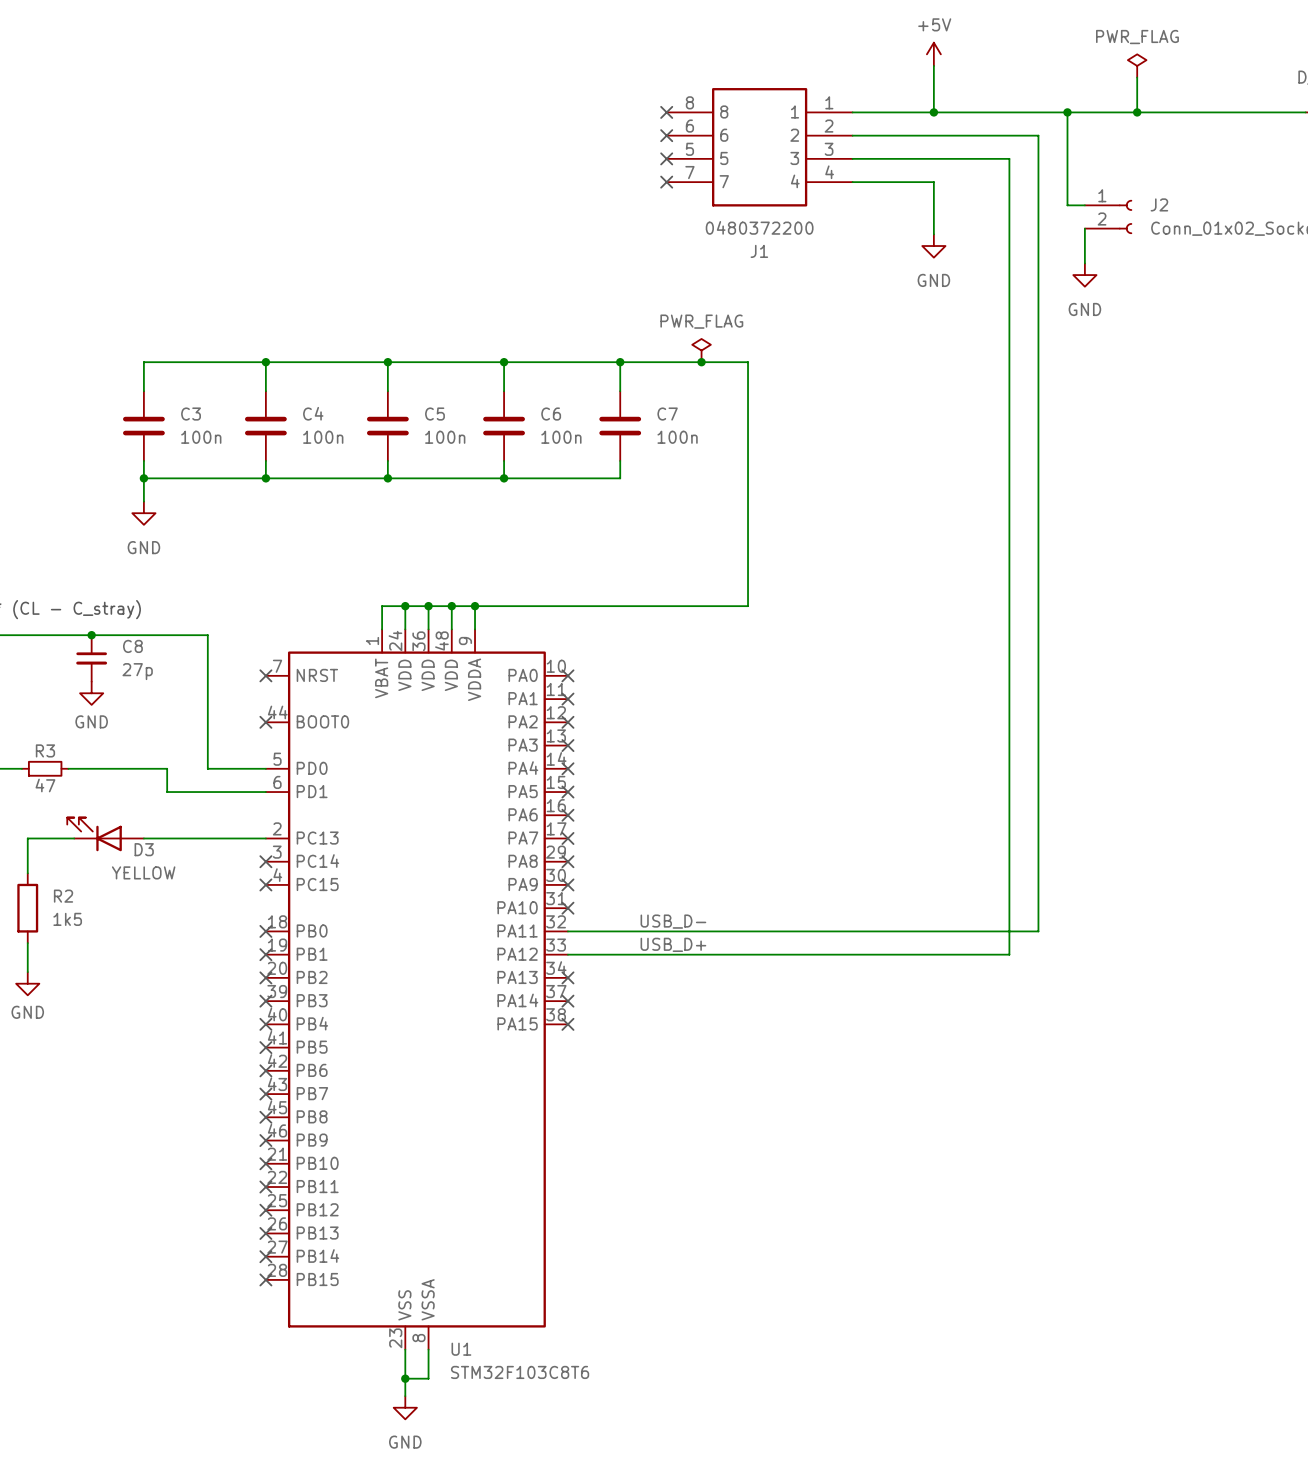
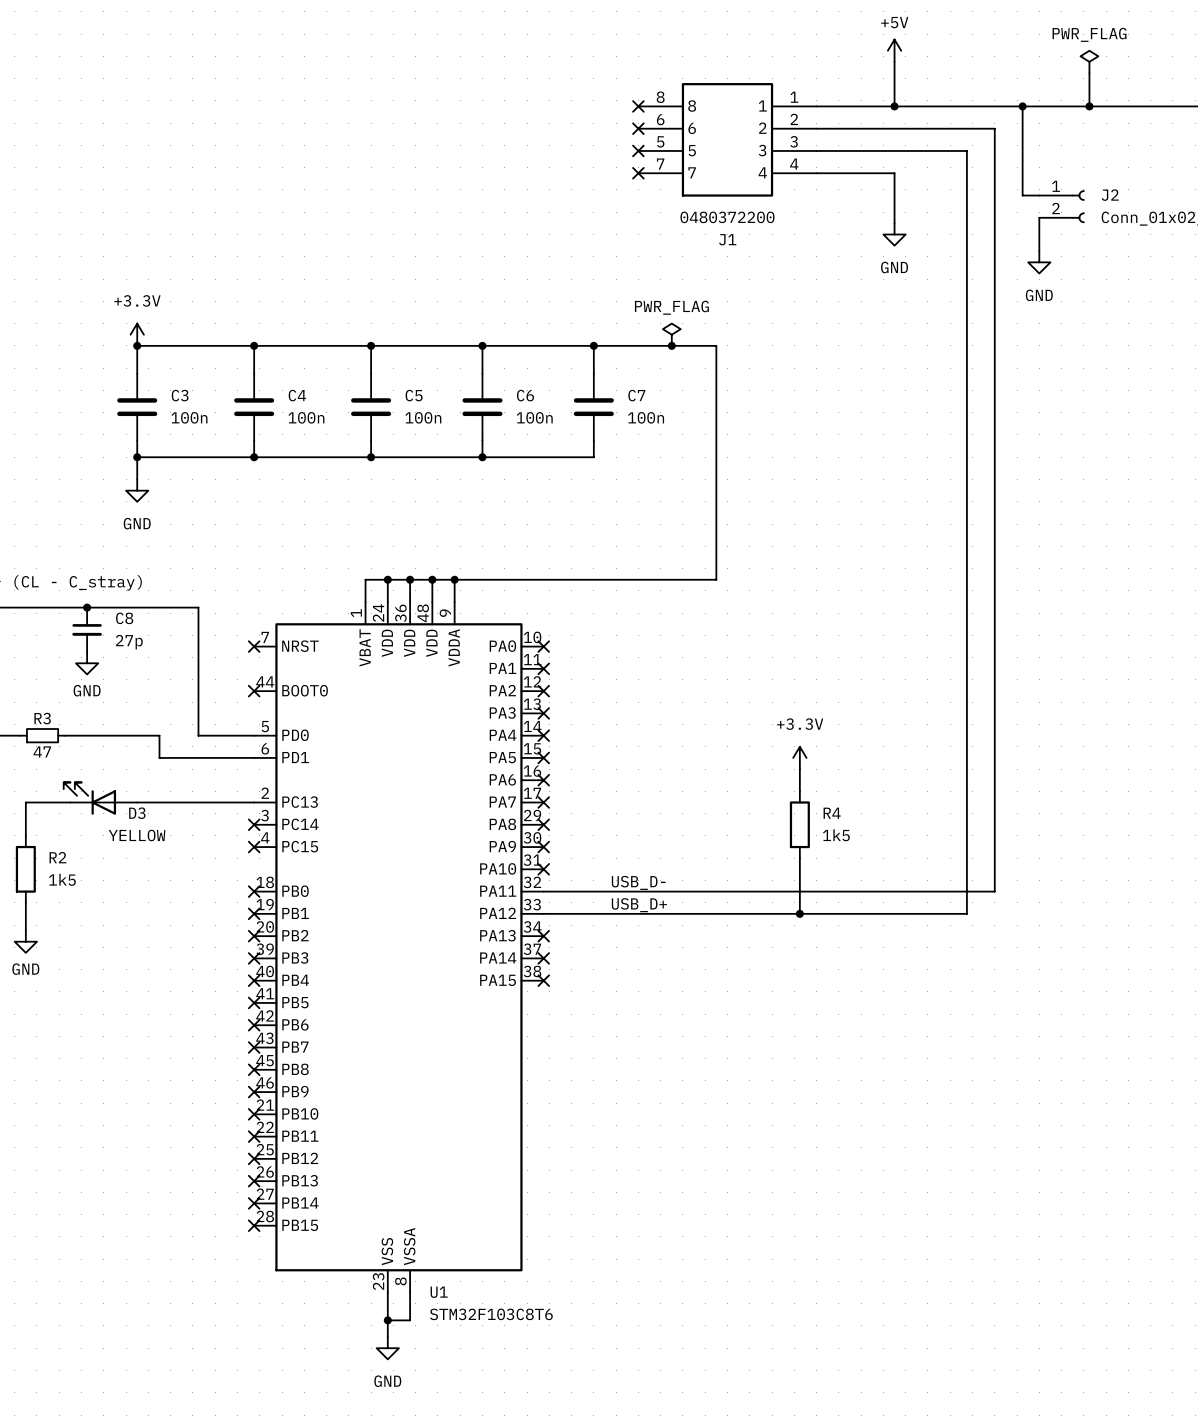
power symbol: none -> +3.3V (137, 334)
junction: none -> (137, 345)
power symbol: none -> +3.3V (799, 757)
wire: none -> (799, 769) (799, 791)
R4: none -> 1k5 (799, 824)
wire: none -> (799, 858) (799, 913)
junction: none -> (799, 913)

